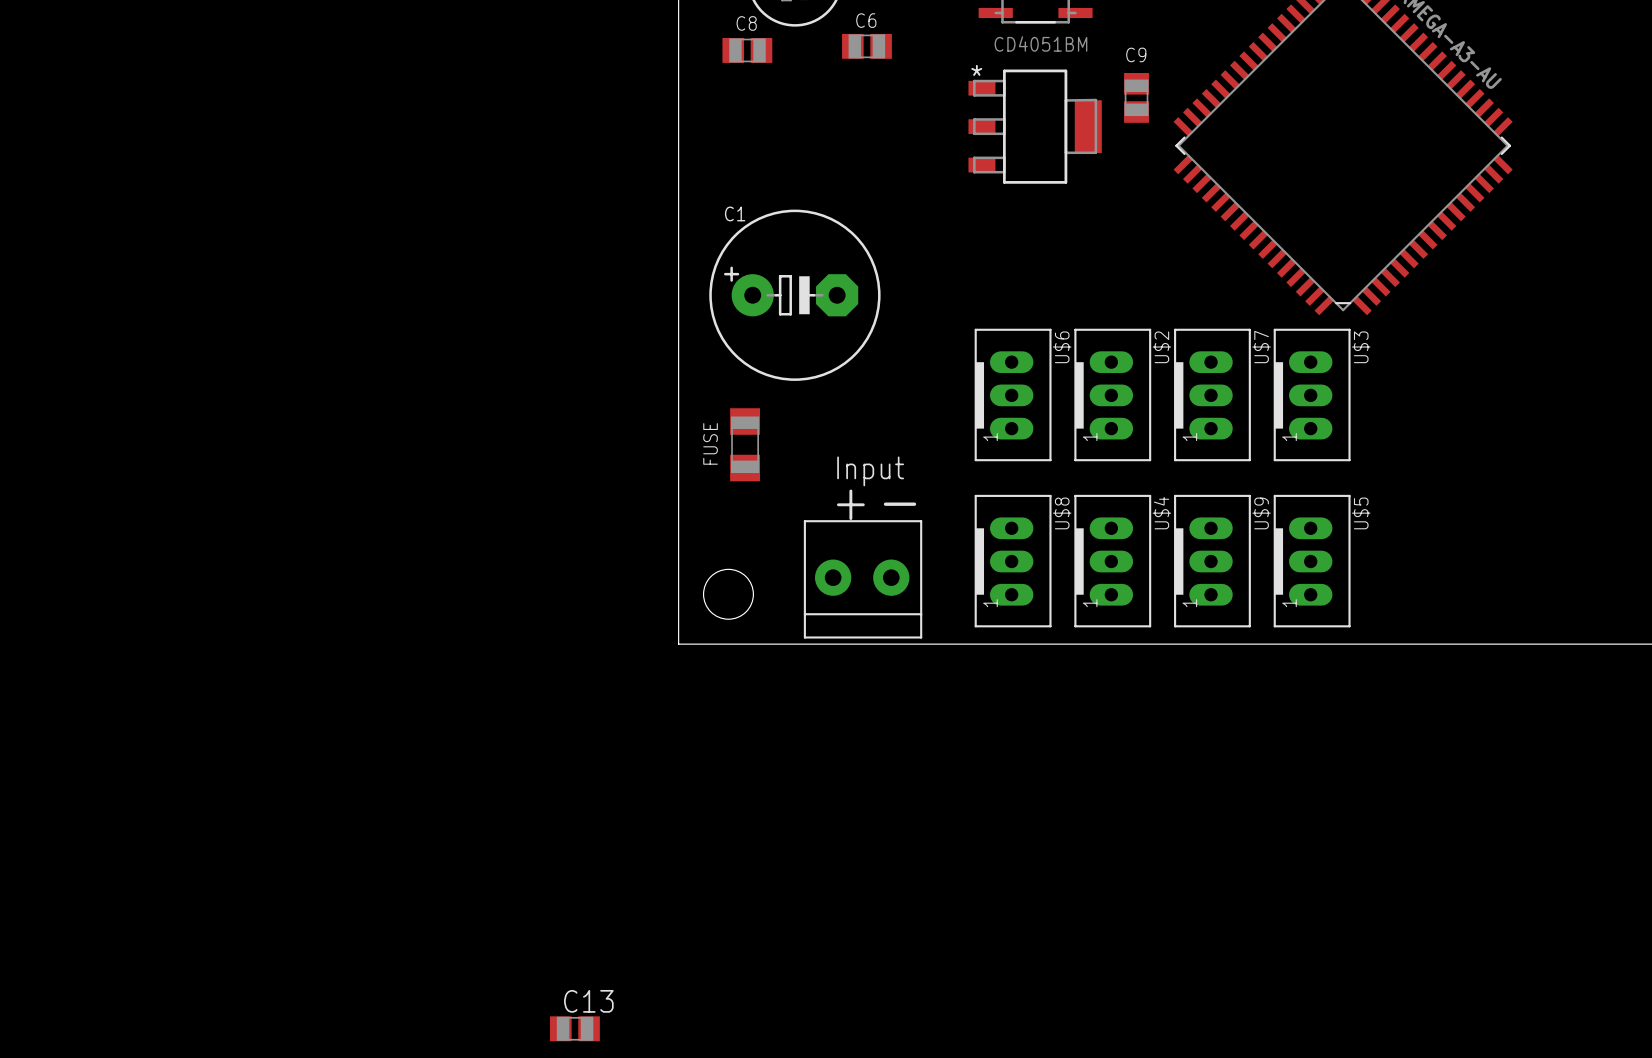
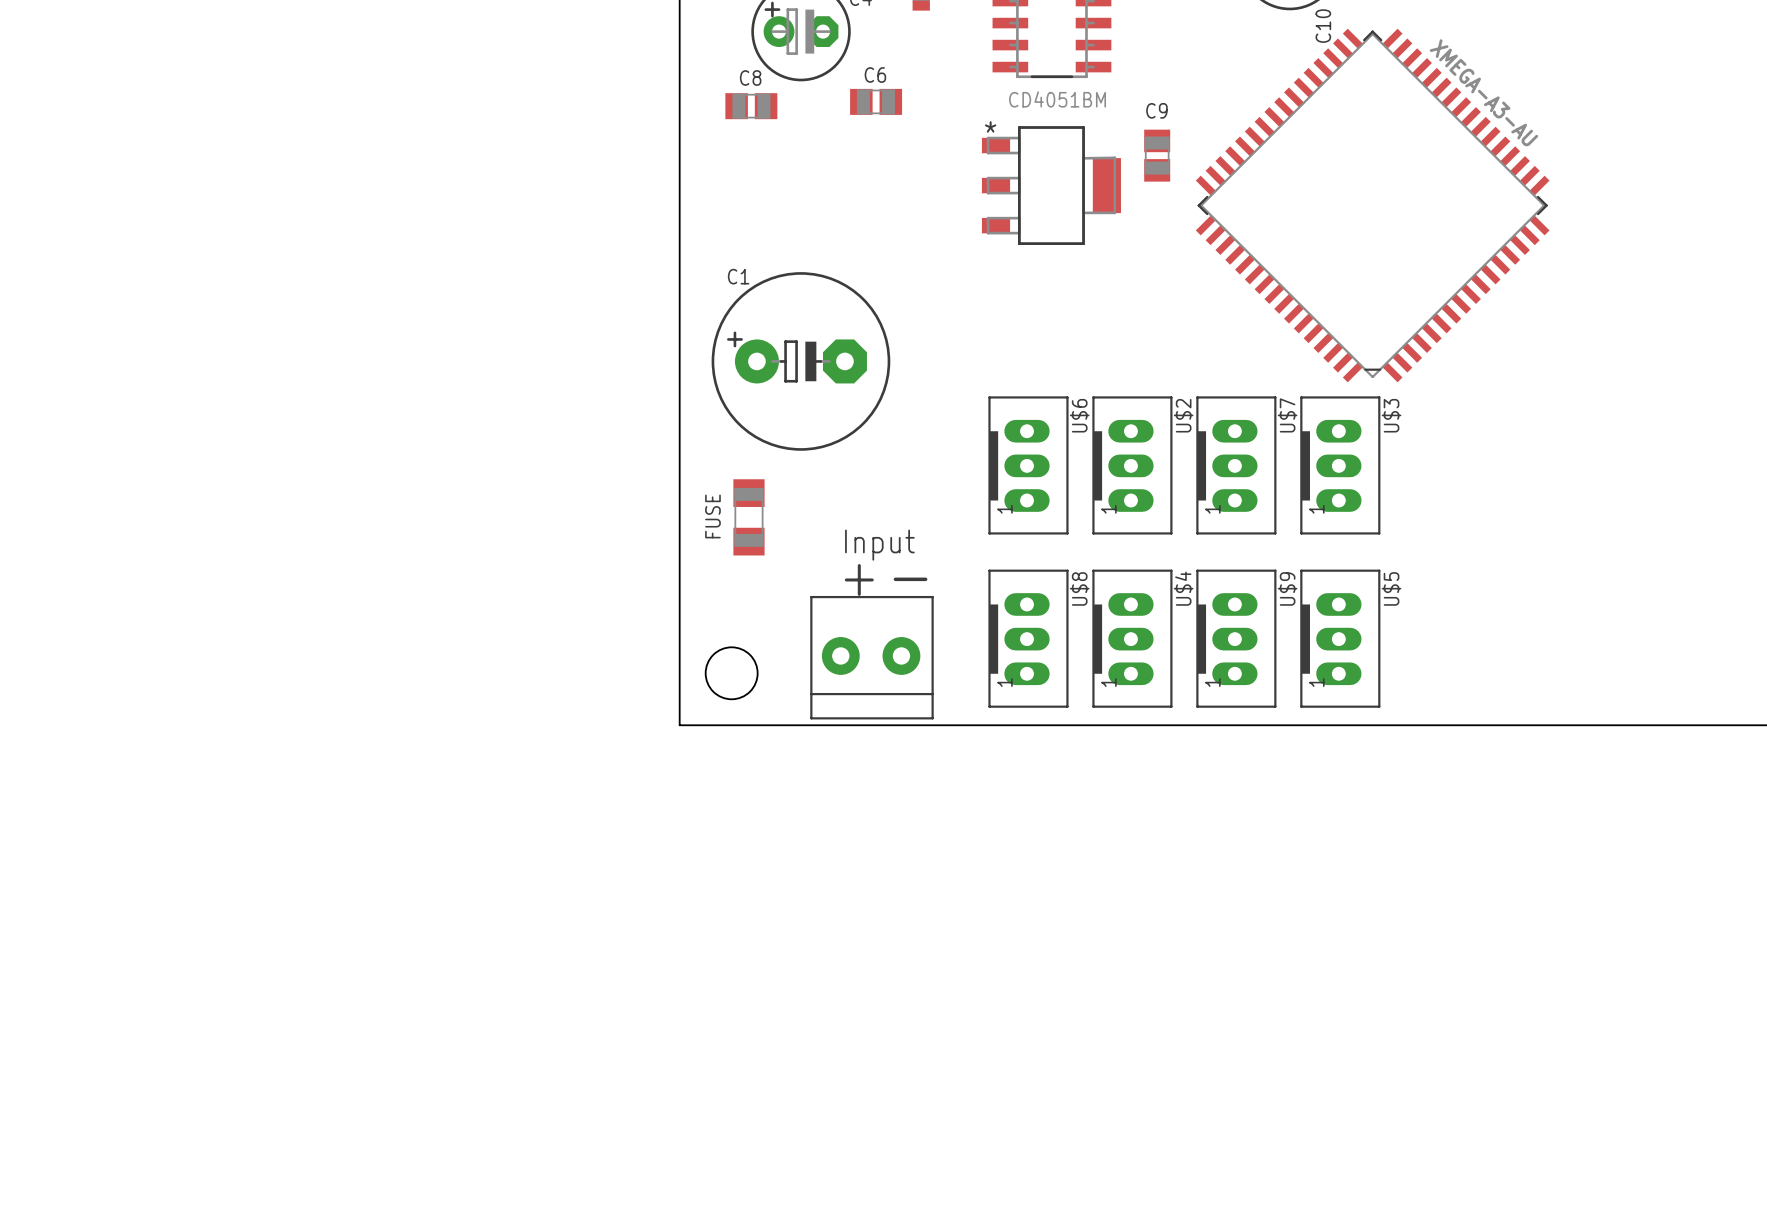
C13: (574, 1028) -> none

